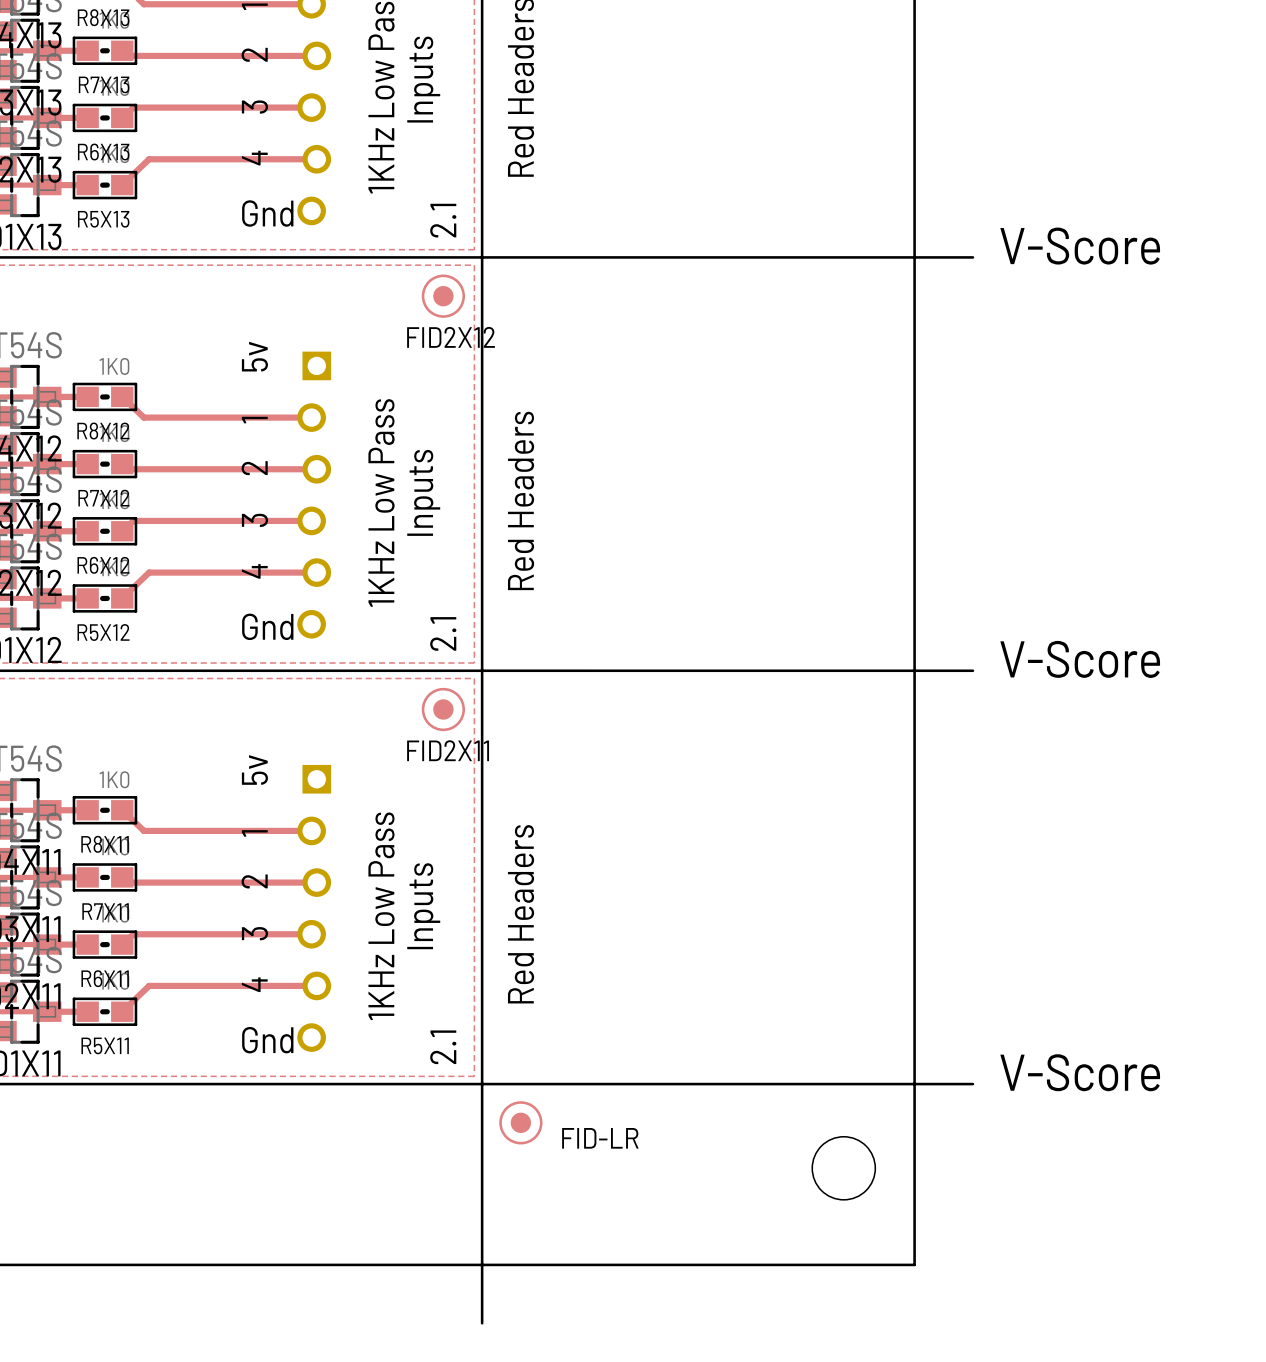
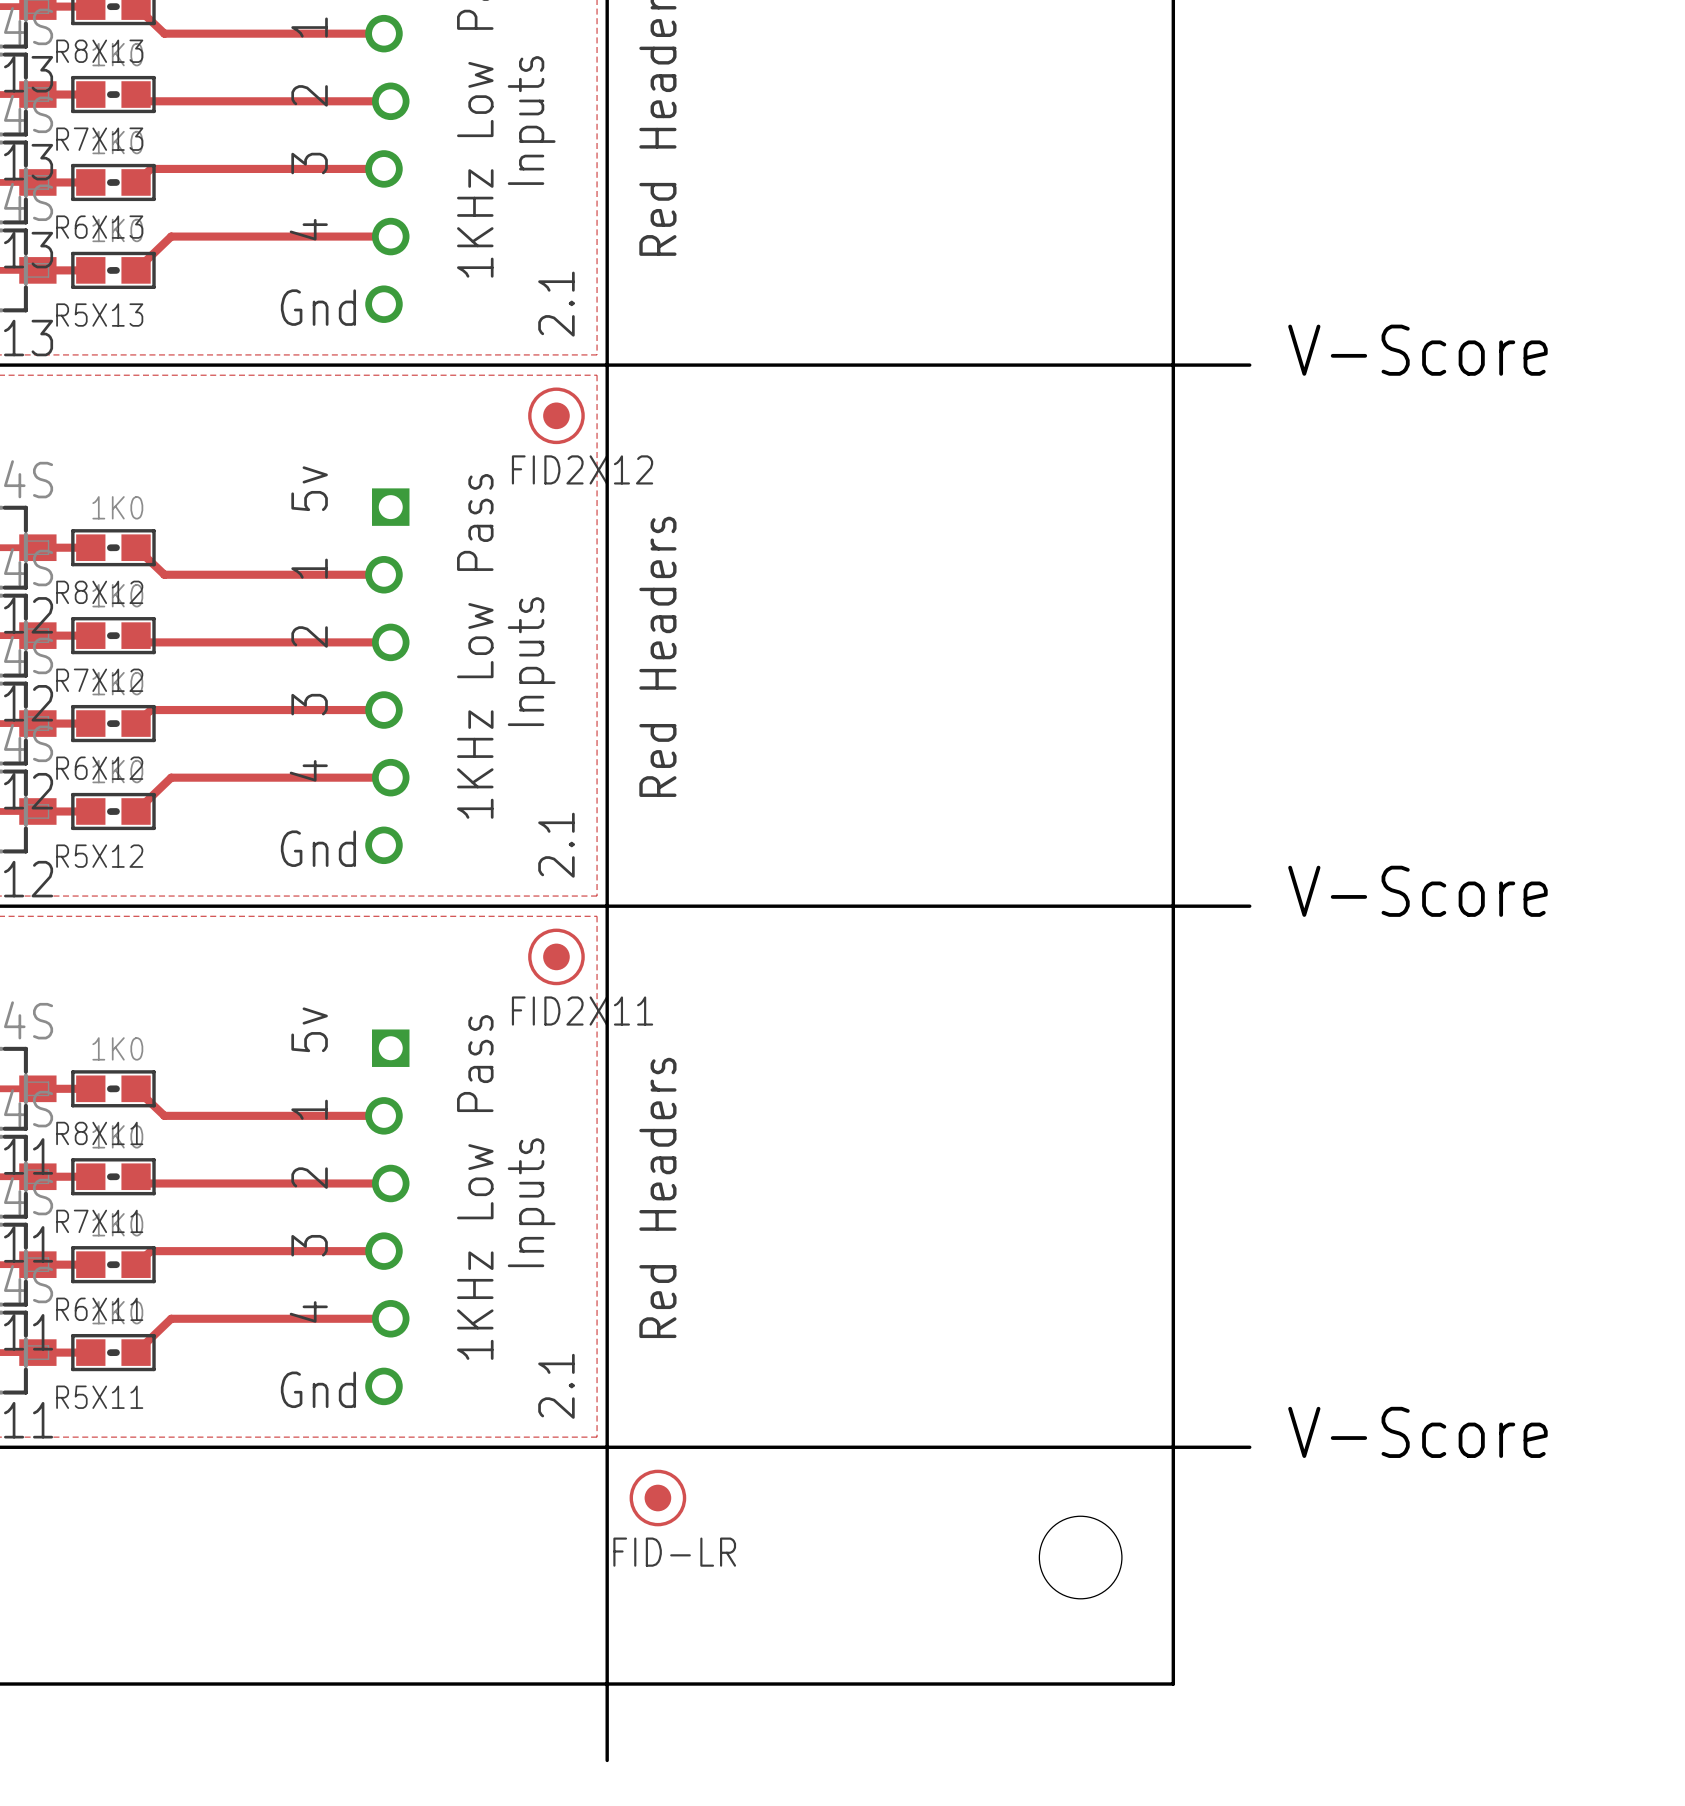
FID-LR name position: FID-LR (600, 1138) -> FID-LR (674, 1552)

